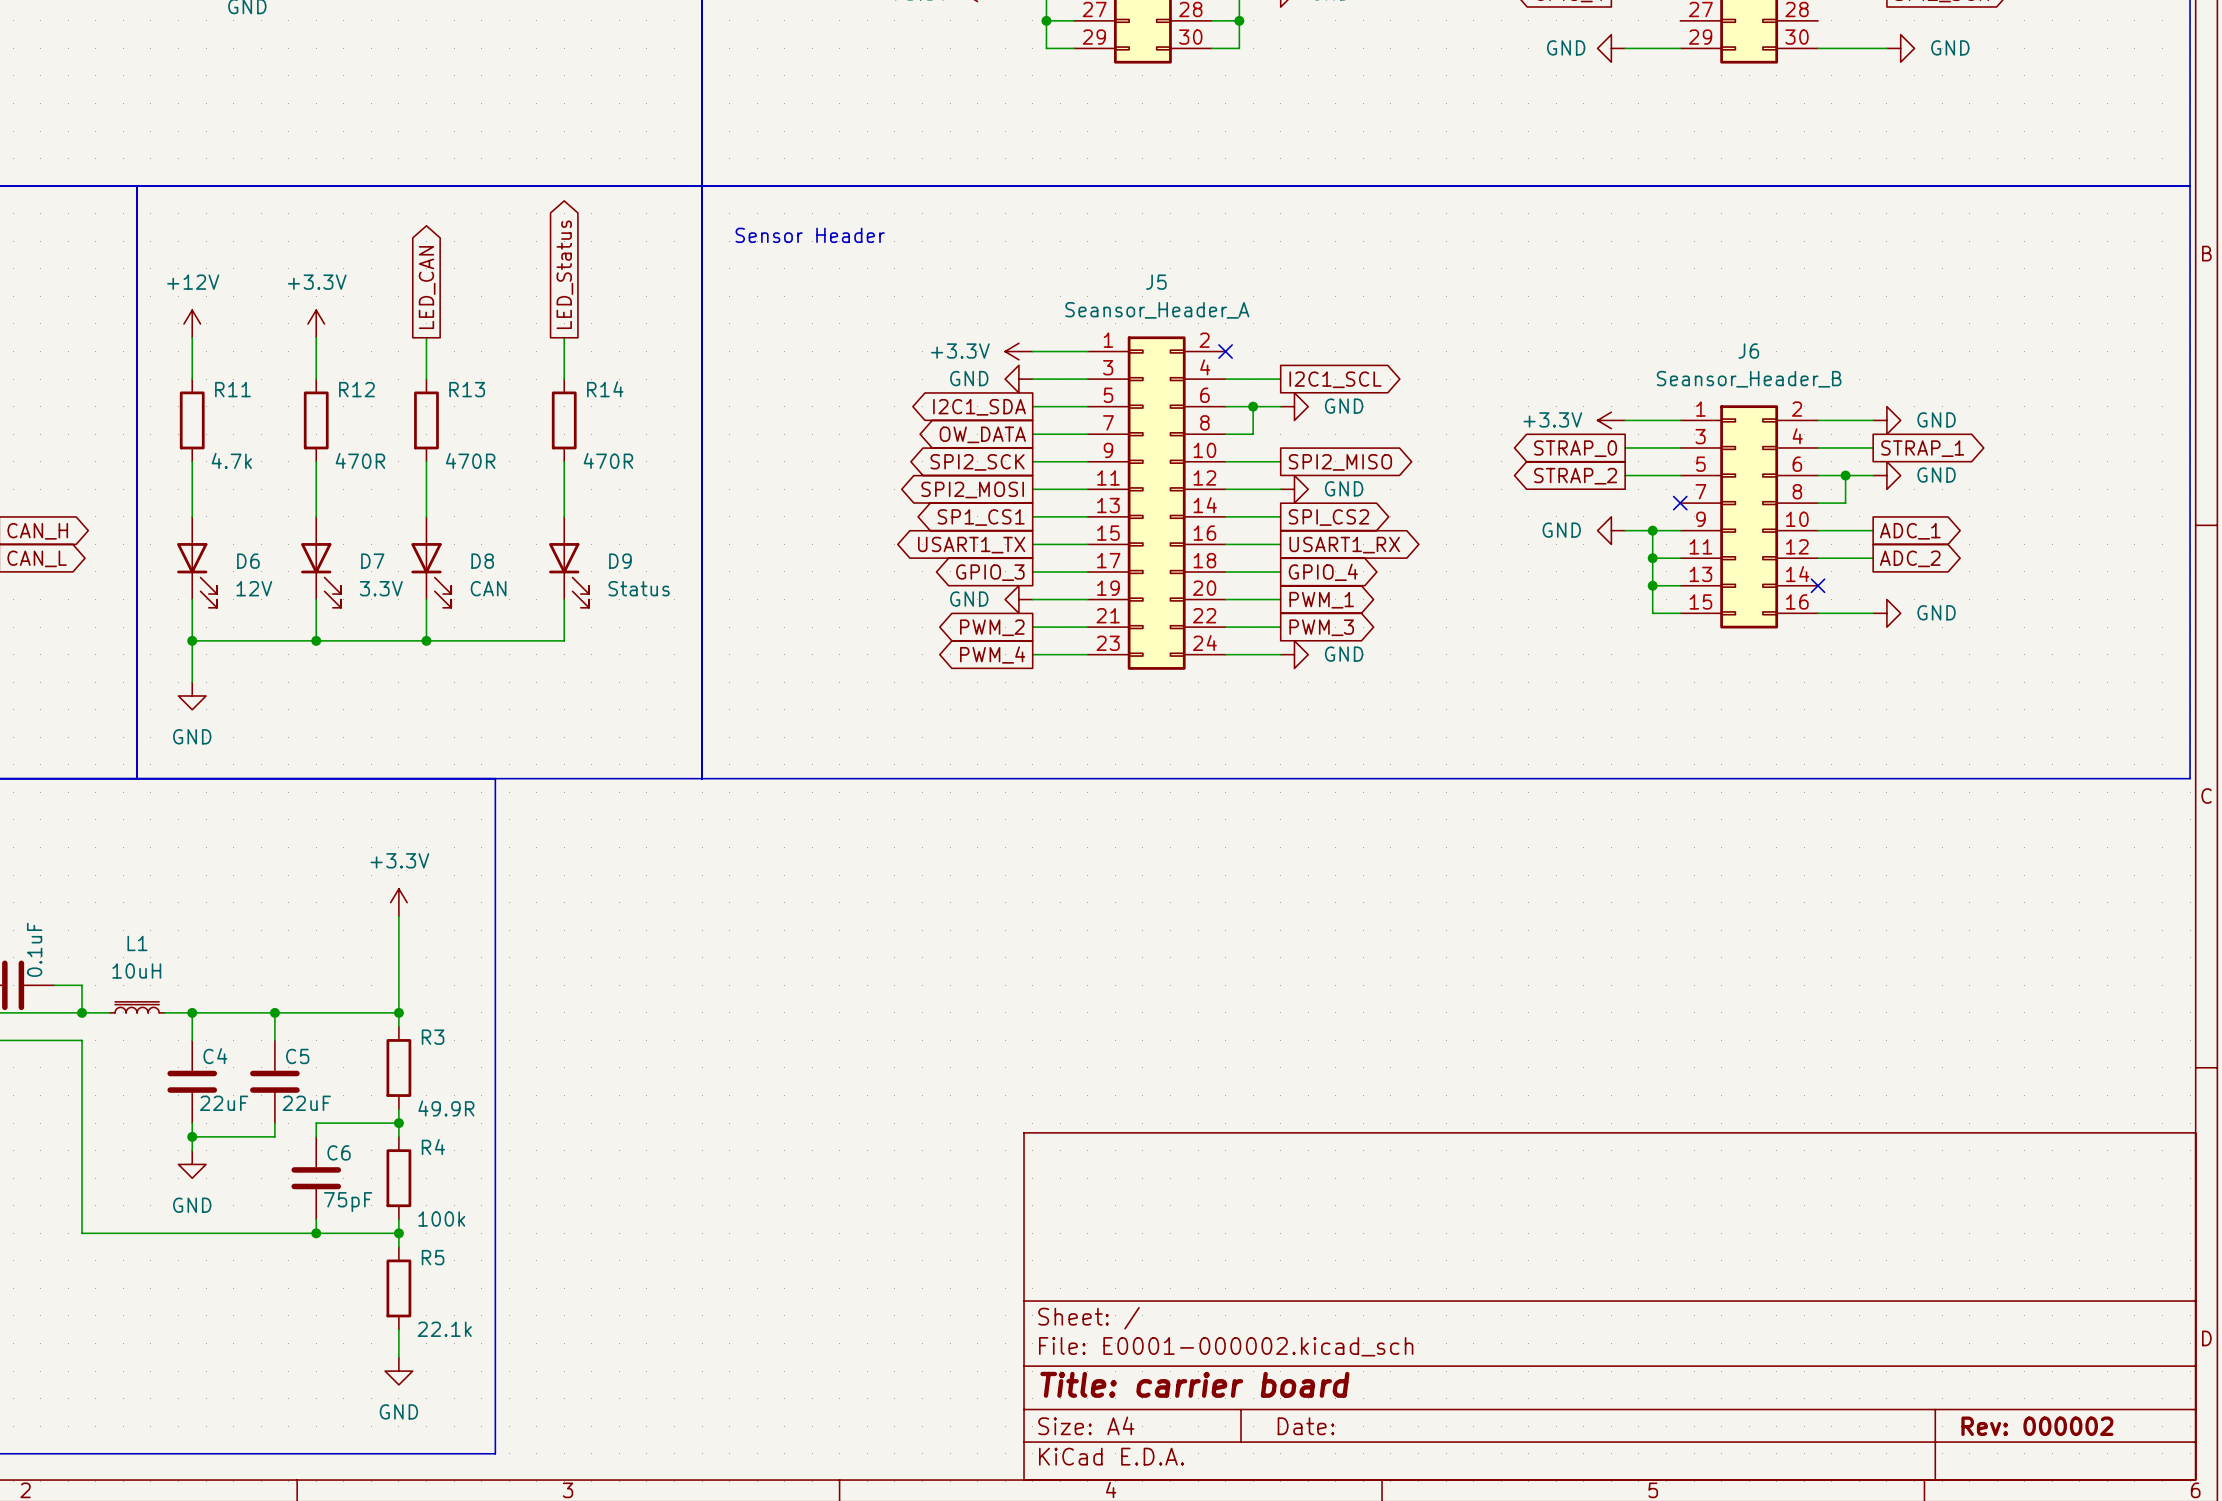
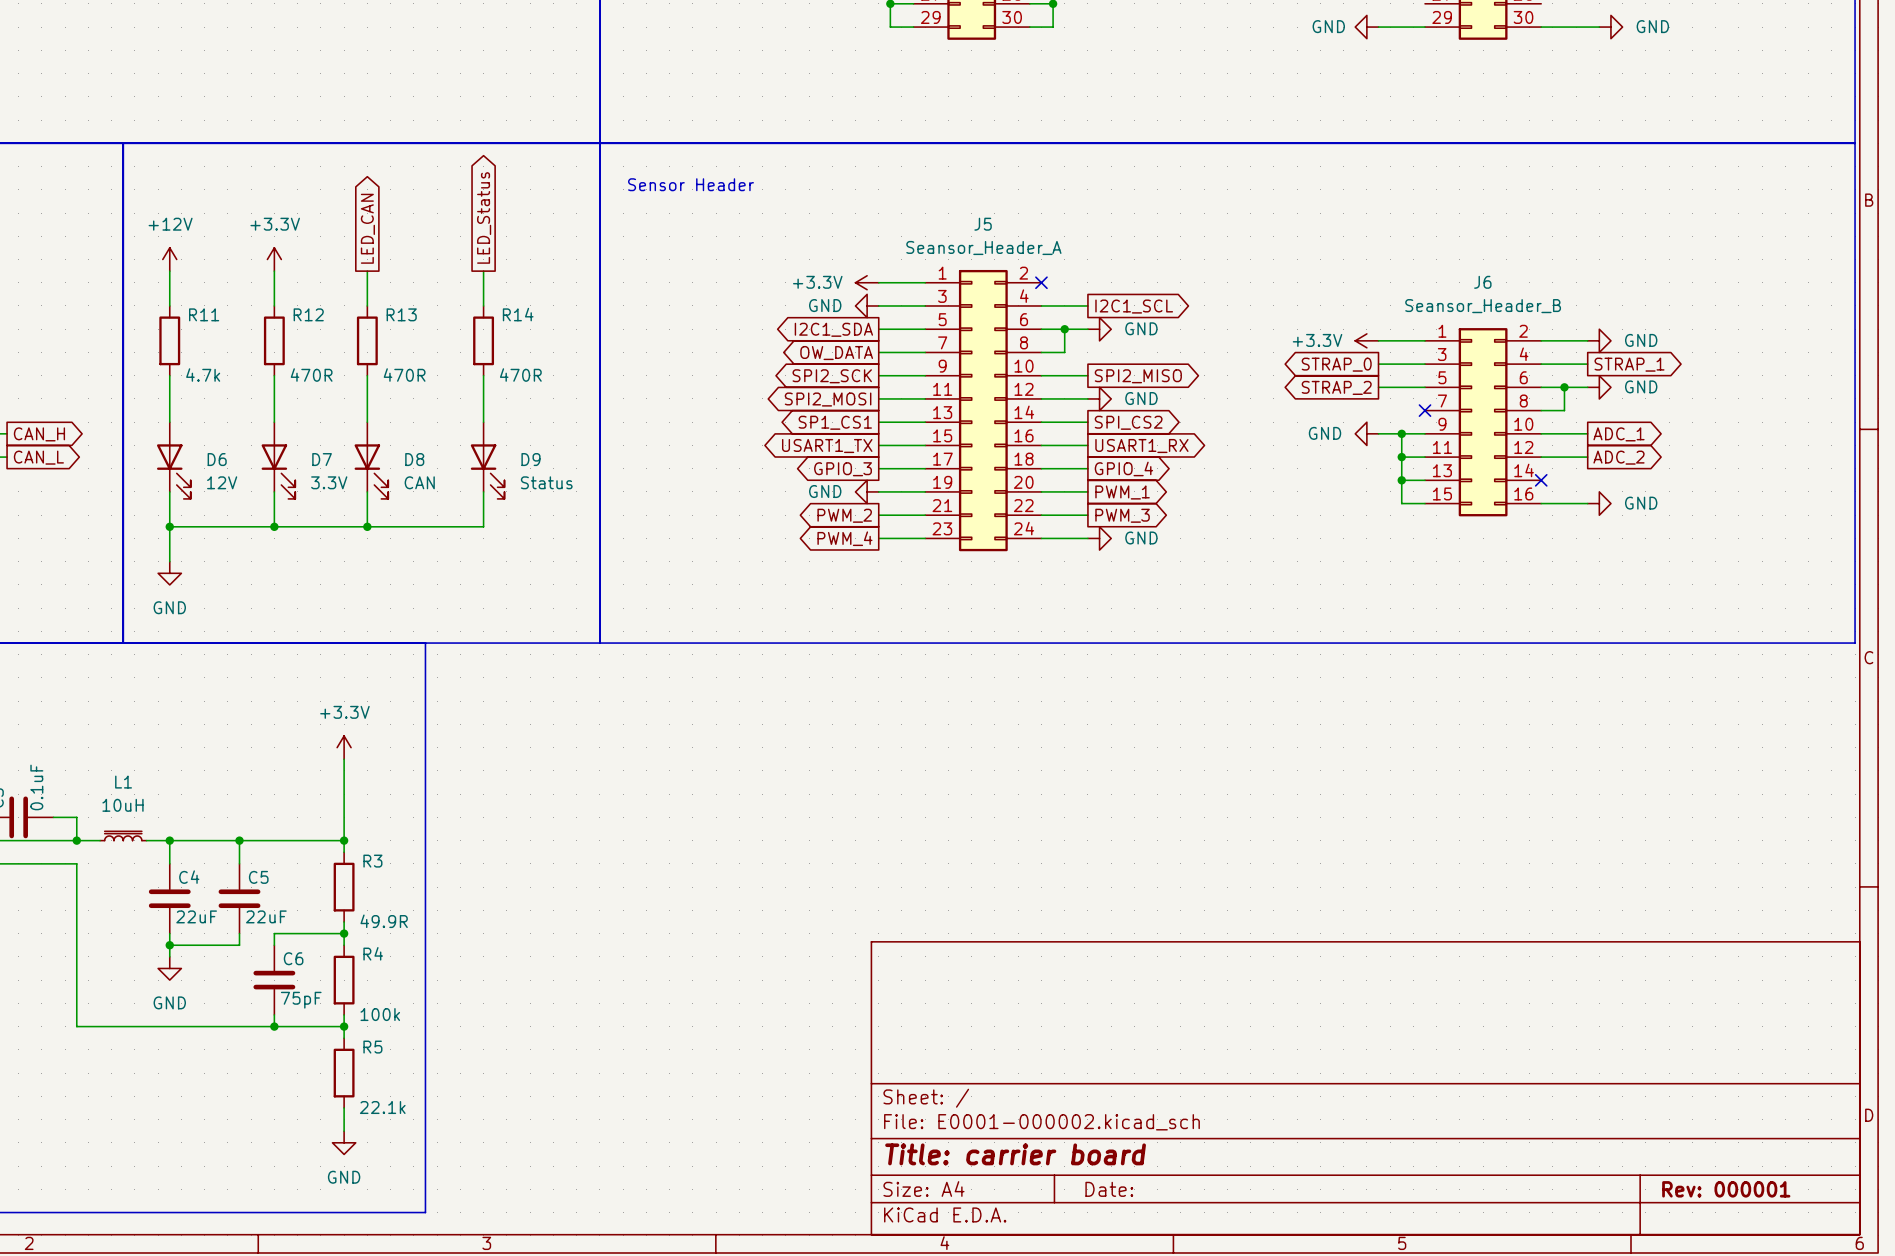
title block: Rev: 000002 (2037, 1426) -> Rev: 000001 (1726, 1189)

